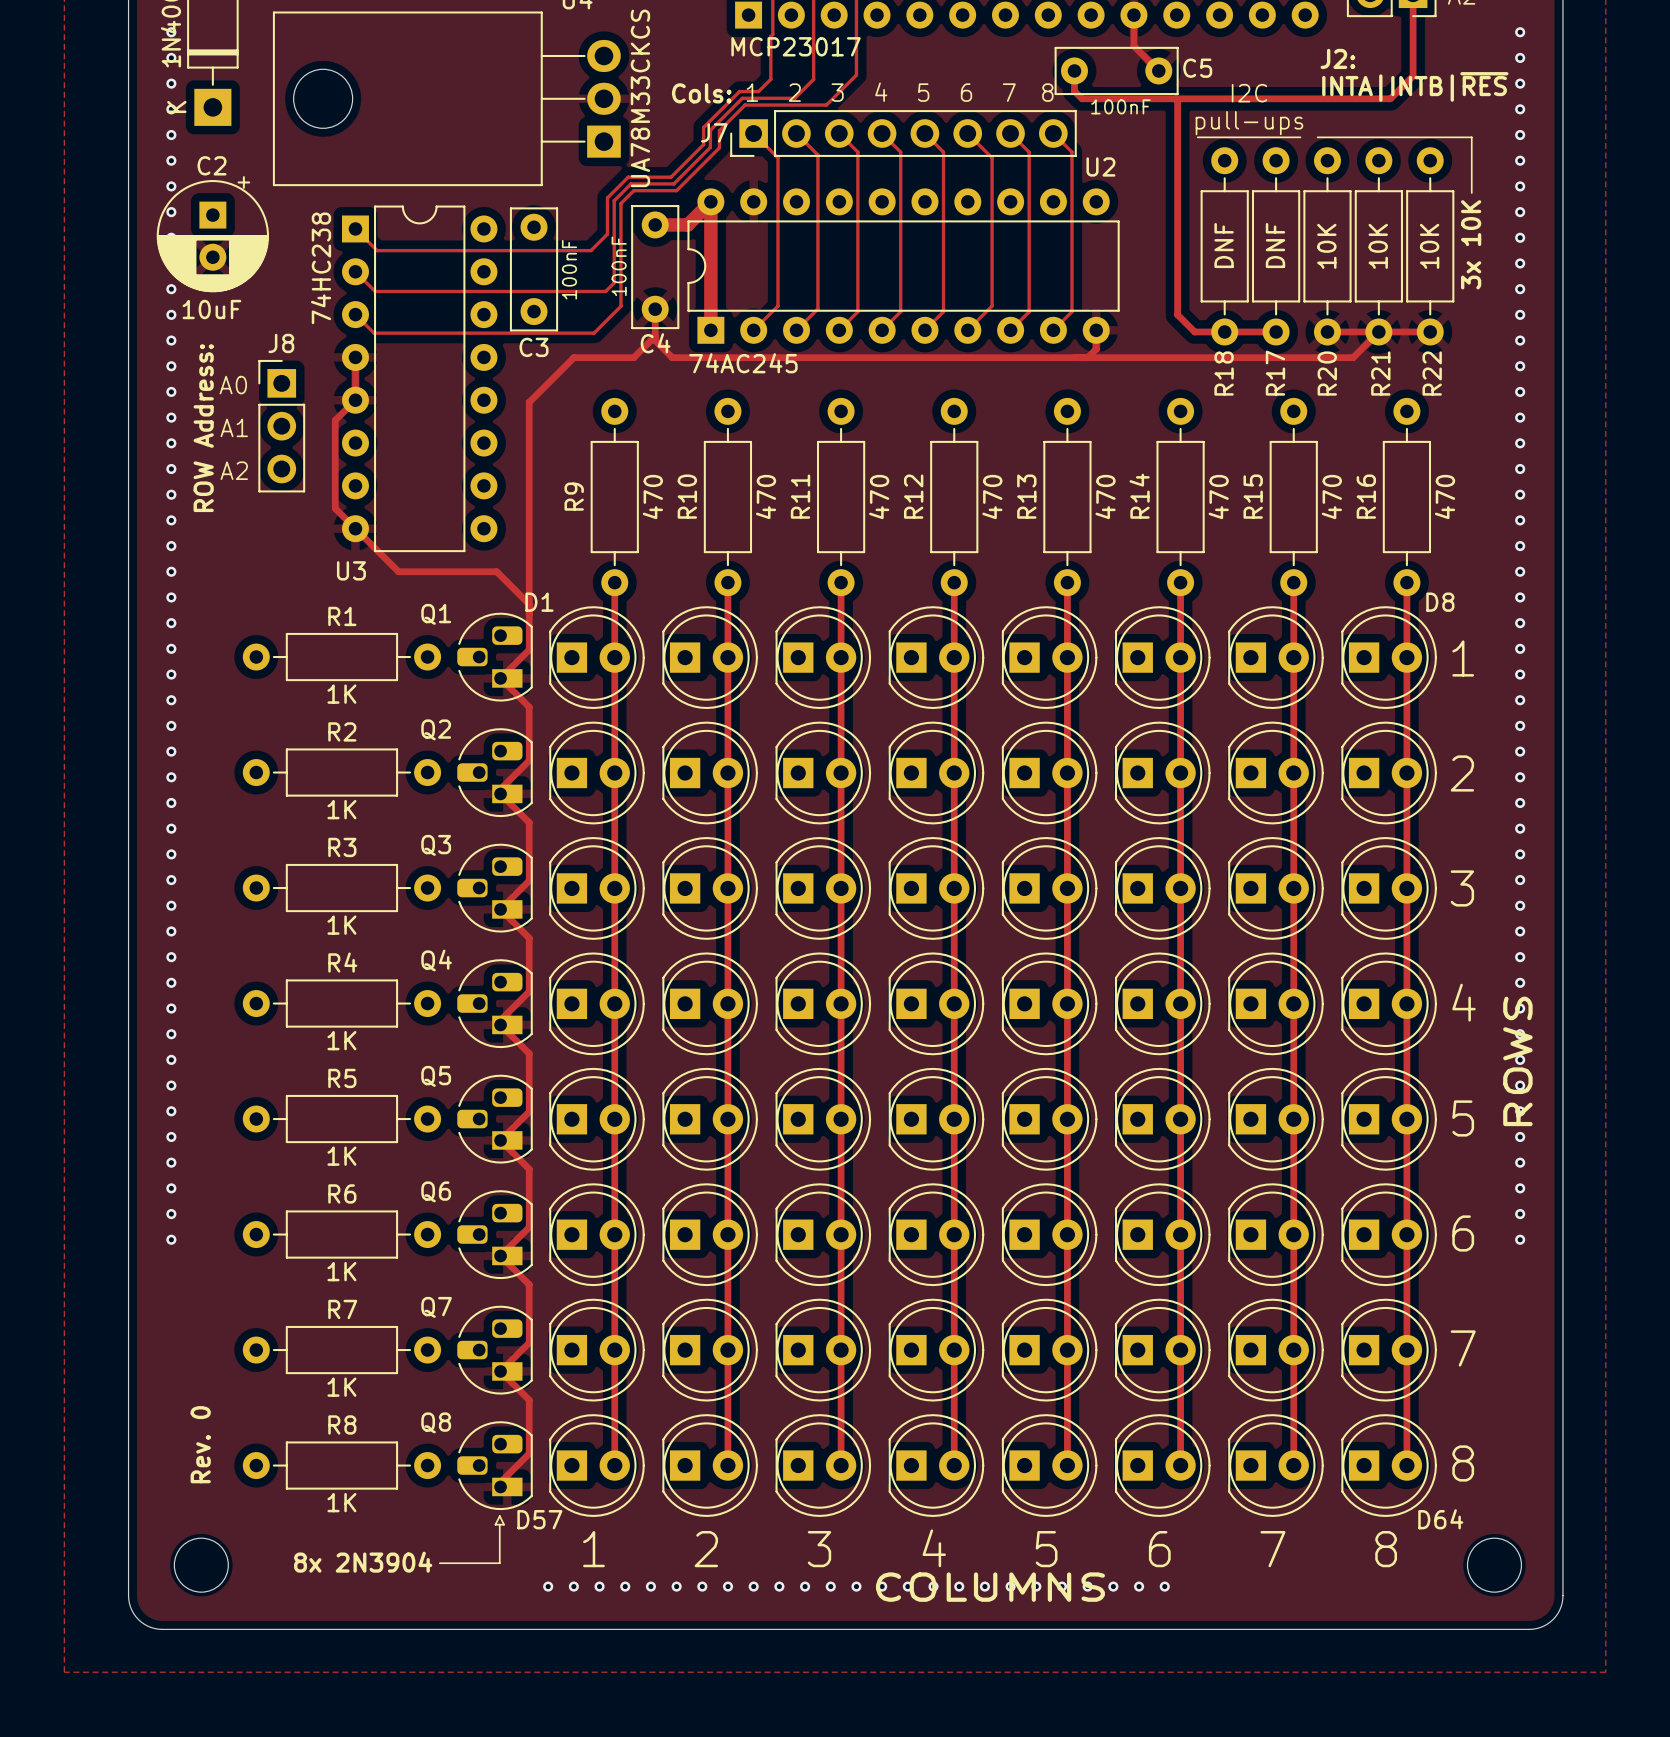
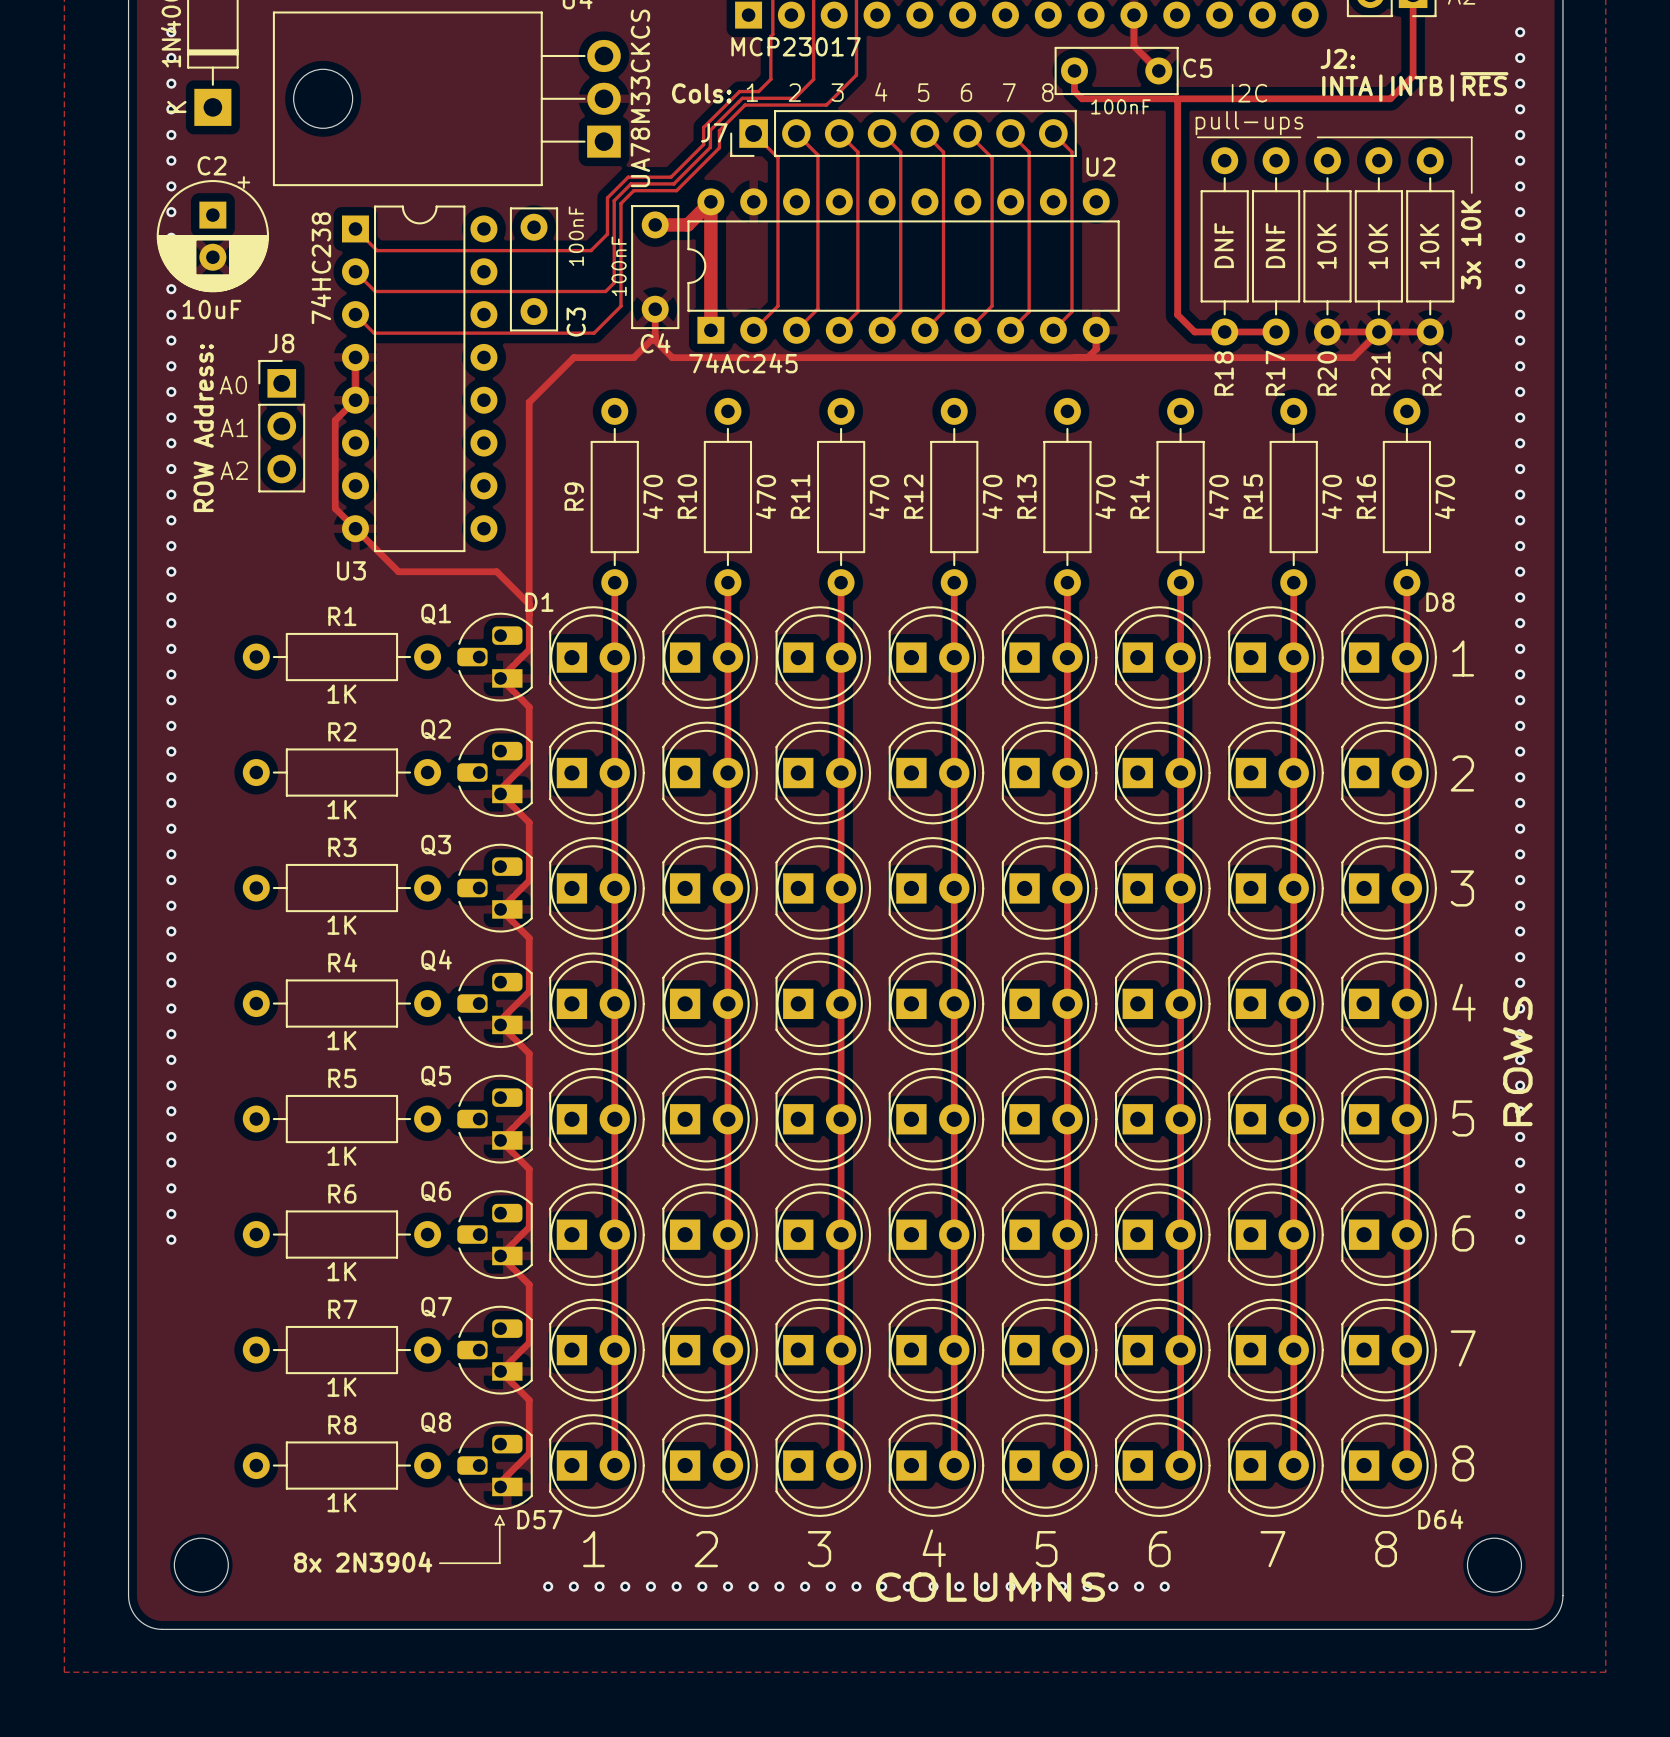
C3 value position: 100nF (569, 269) -> 100nF (576, 236)
C3 name rotation: 0° (534, 347) -> 90° counterclockwise (576, 322)
C3 name position: C3 (534, 347) -> C3 (576, 322)
text: Rev. 0 (200, 1444) -> none

